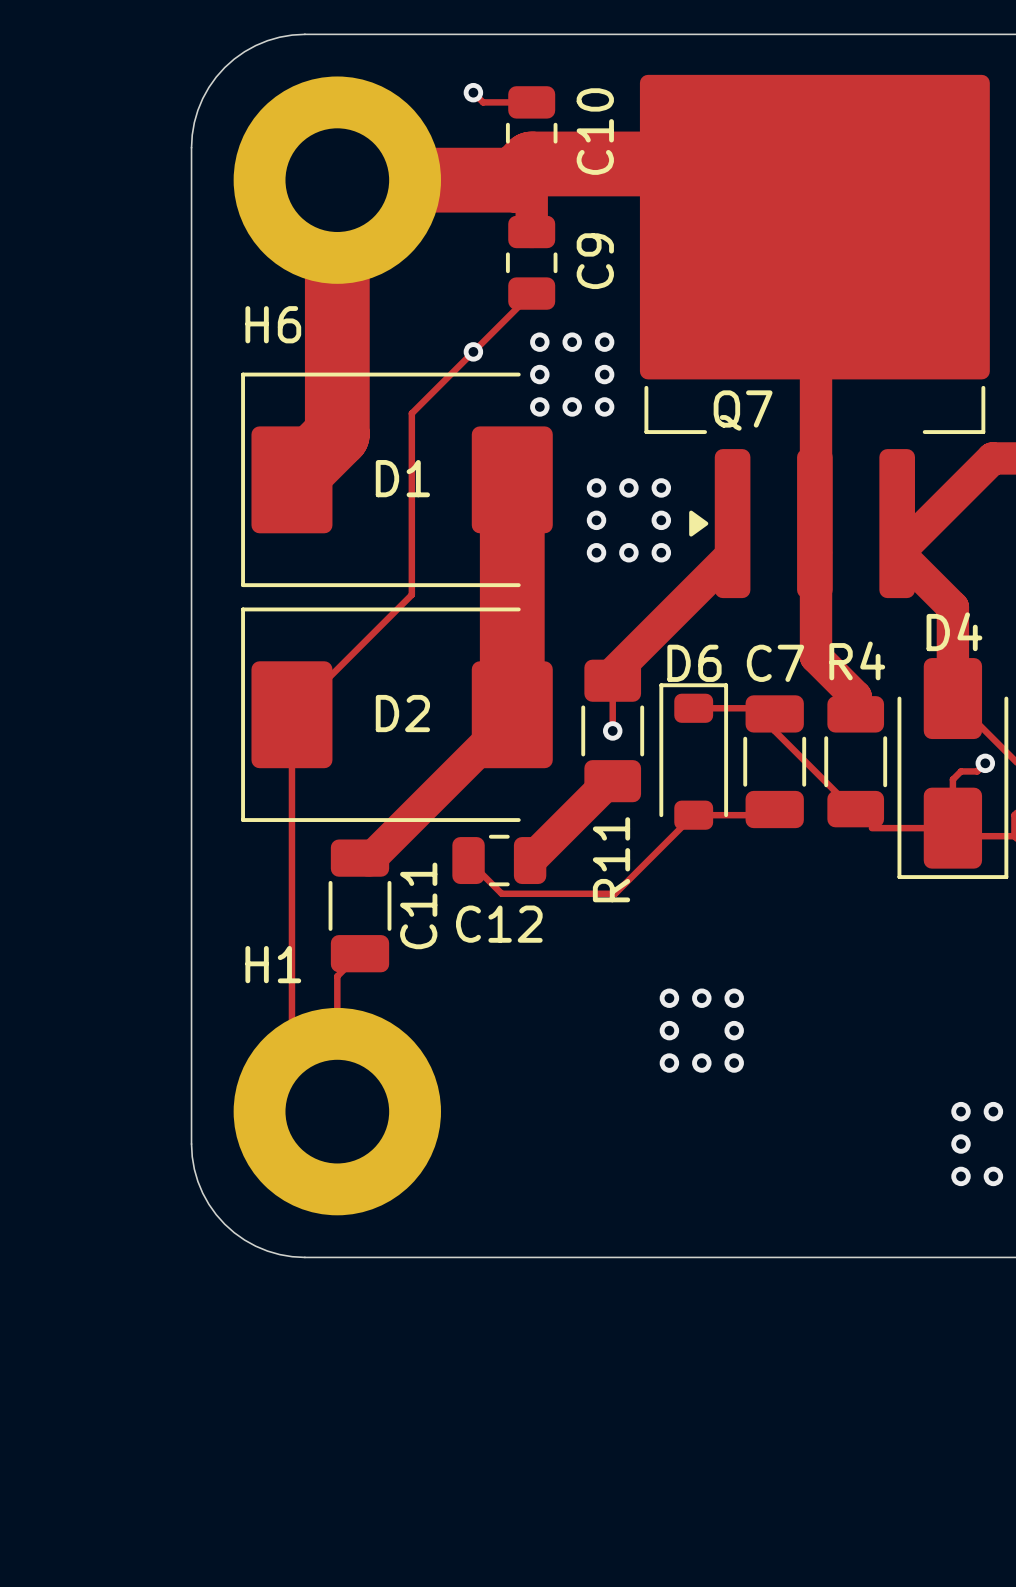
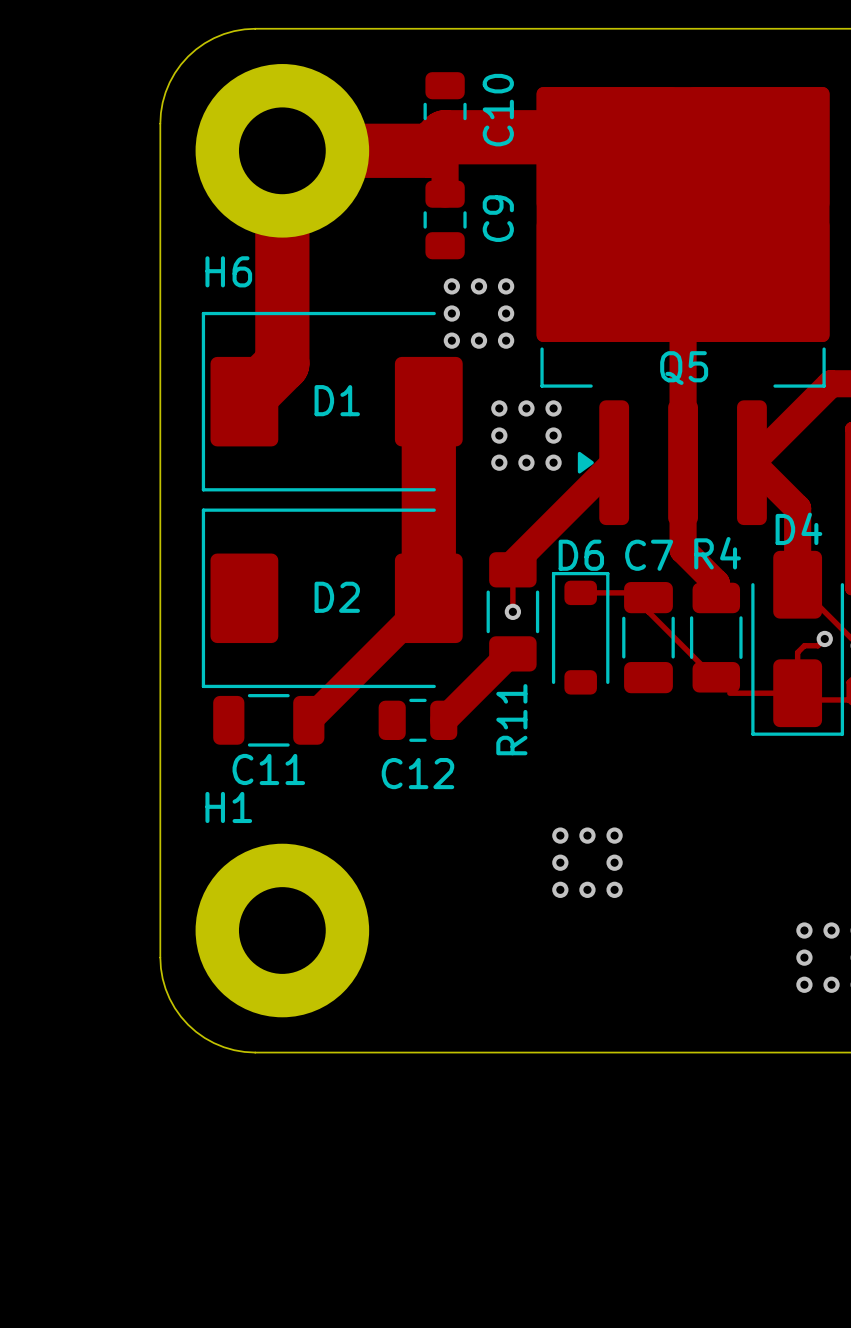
track: (473, 92) (483, 102) (531, 102) -> none
via: (473, 92) -> none
track: (531, 293) (411, 413) (411, 594) (291, 714) (291, 1066) (337, 1111) (337, 976) (360, 953) -> none
Q7: (814, 336) -> none
via: (473, 351) -> none
Q5: none -> (683, 306)
track: (774, 809) (769, 815) (693, 815) (615, 893) (501, 893) (468, 860) -> none
C11 rotation: 0° (360, 905) -> 90° clockwise (268, 720)

